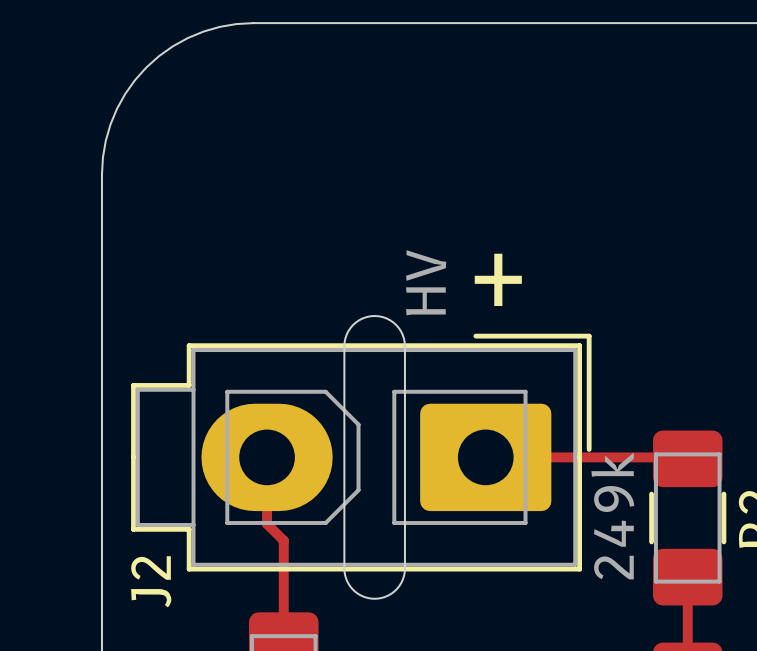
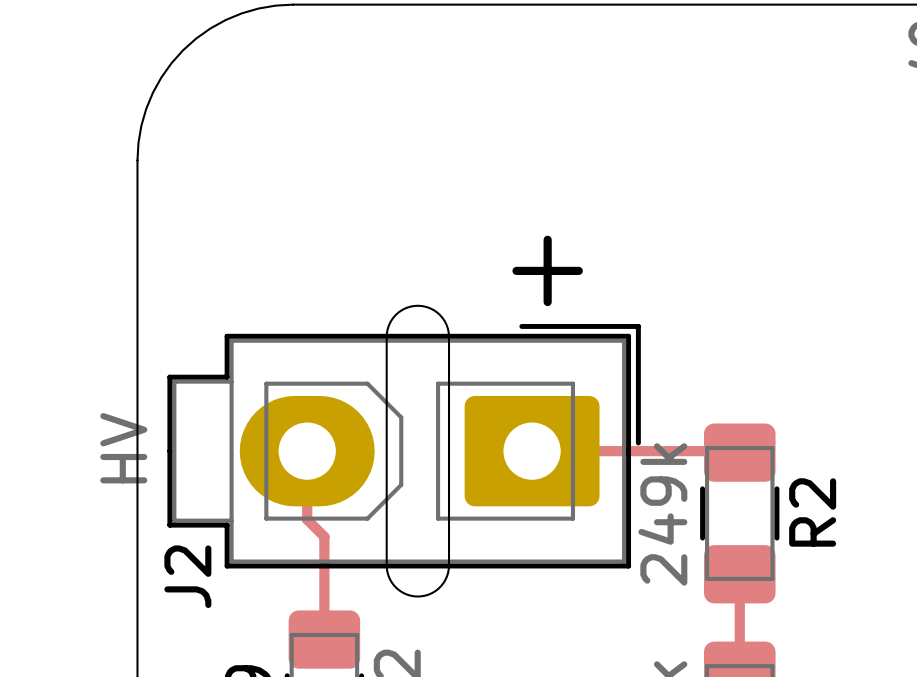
J2 value position: HV (426, 282) -> HV (123, 448)

